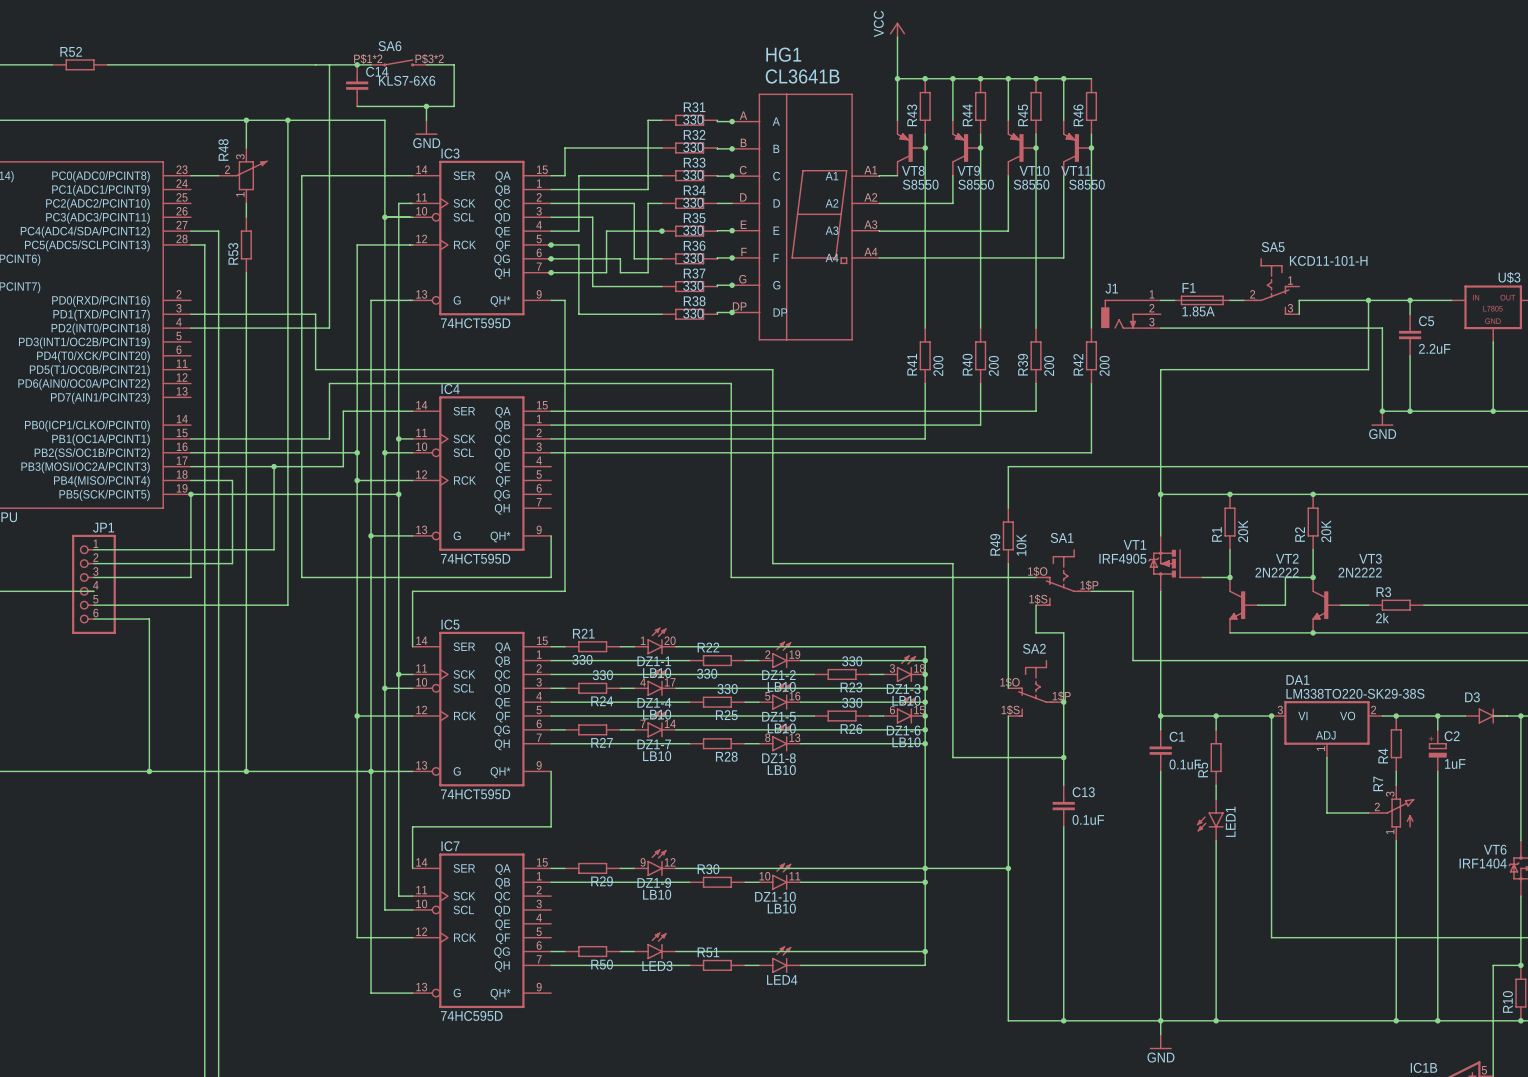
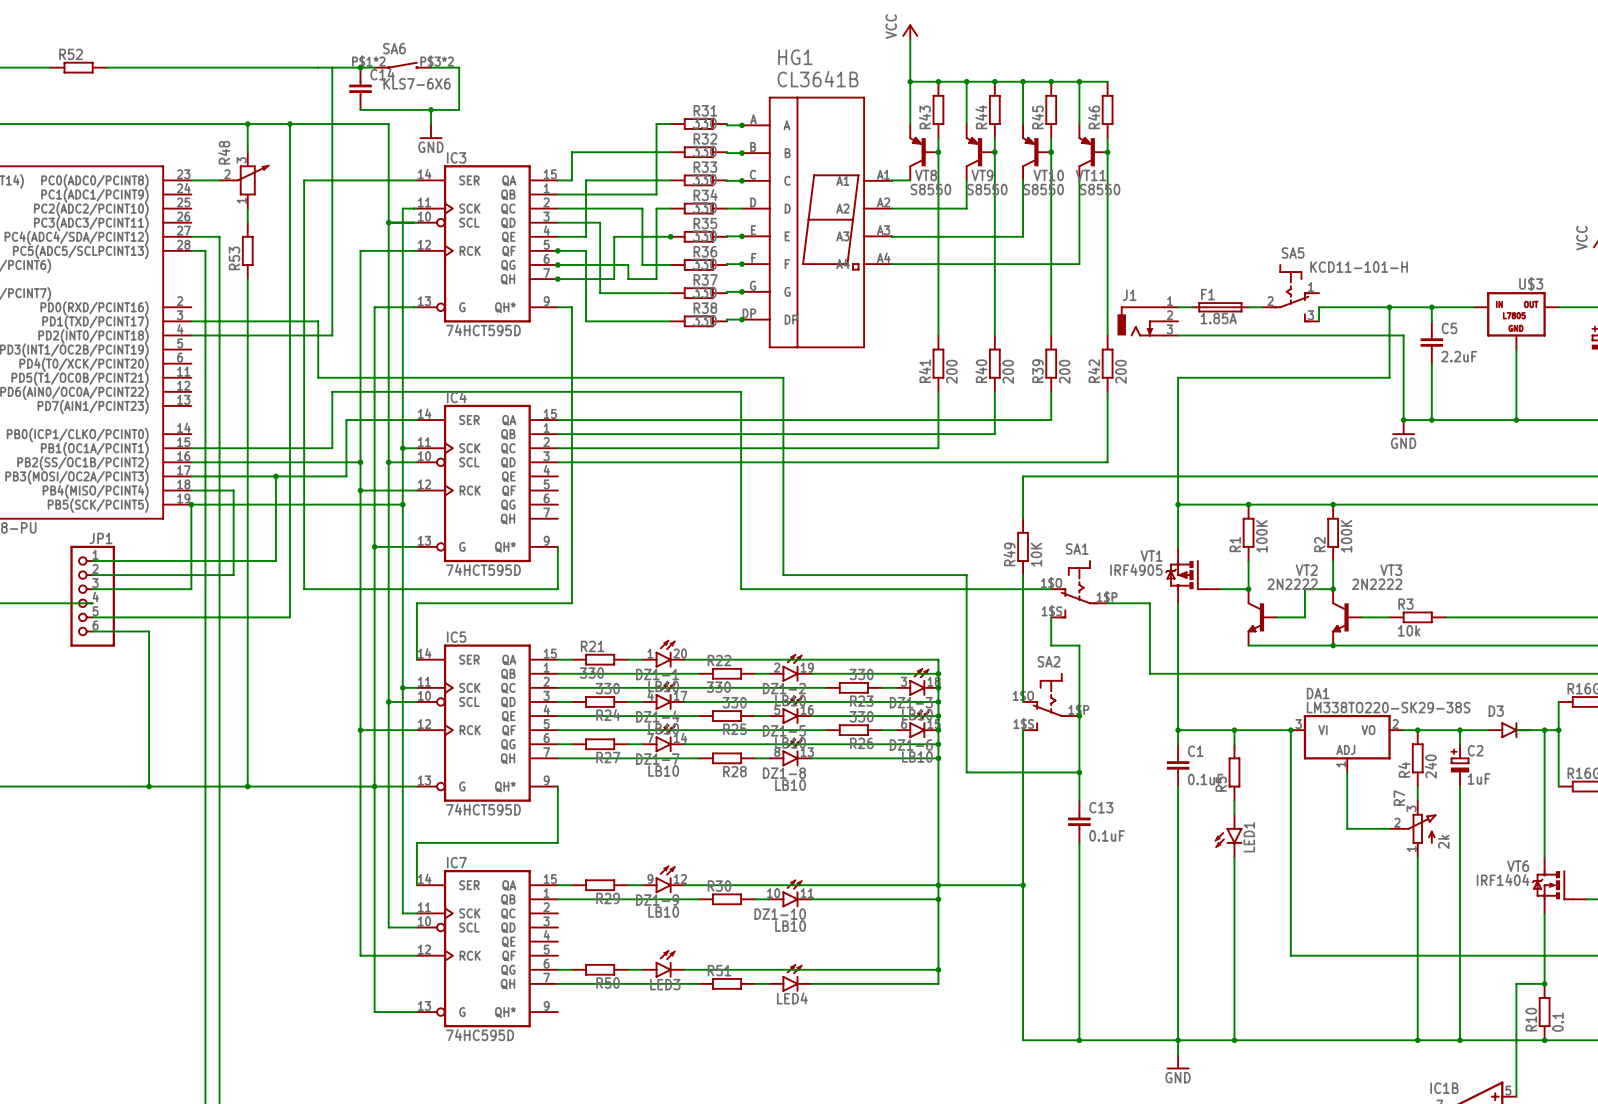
R1 value: 20K (1243, 531) -> 100K (1261, 536)
R2 value: 20K (1326, 531) -> 100K (1346, 536)
R3 value: 2k (1382, 618) -> 10k (1409, 630)
R4 value: none -> 240 (1430, 766)
R7 value: none -> 2k (1443, 841)

